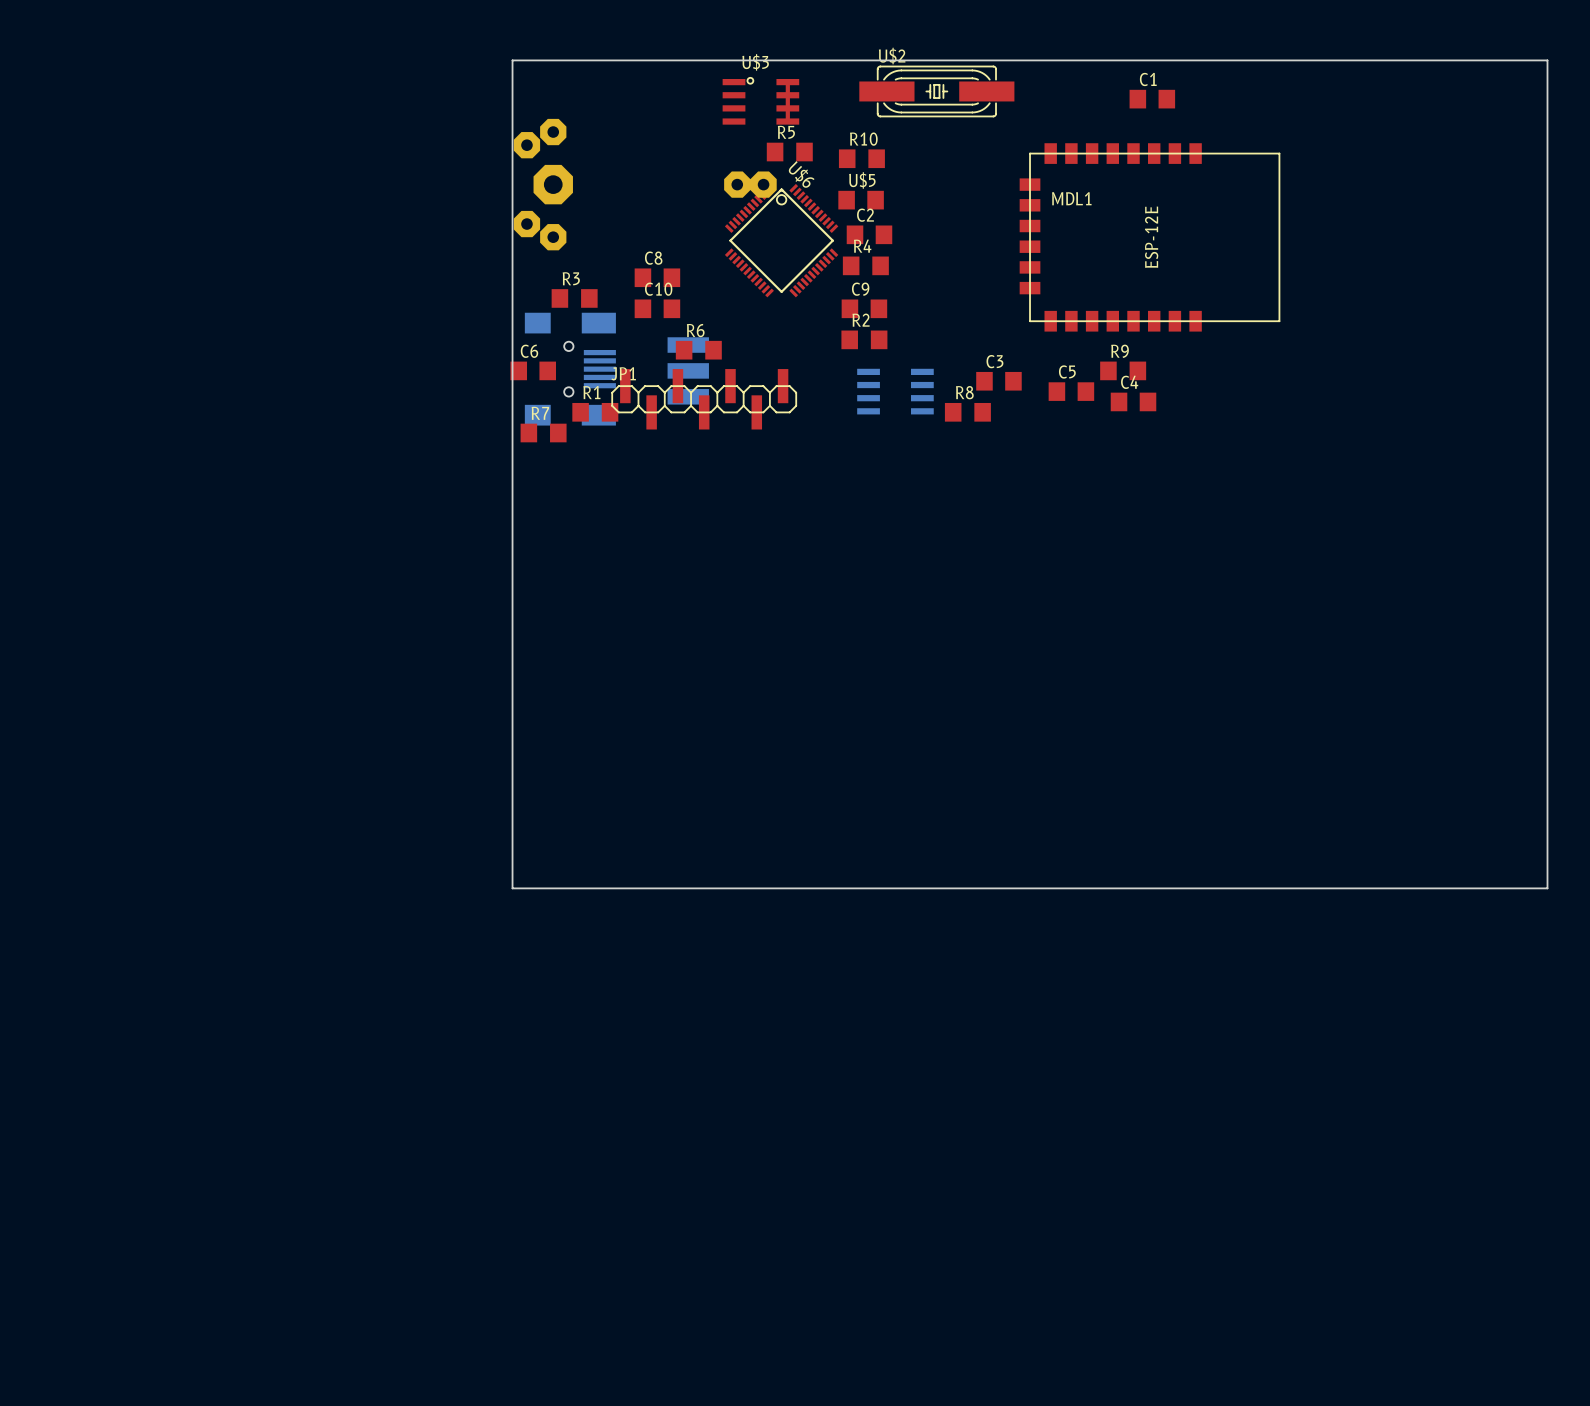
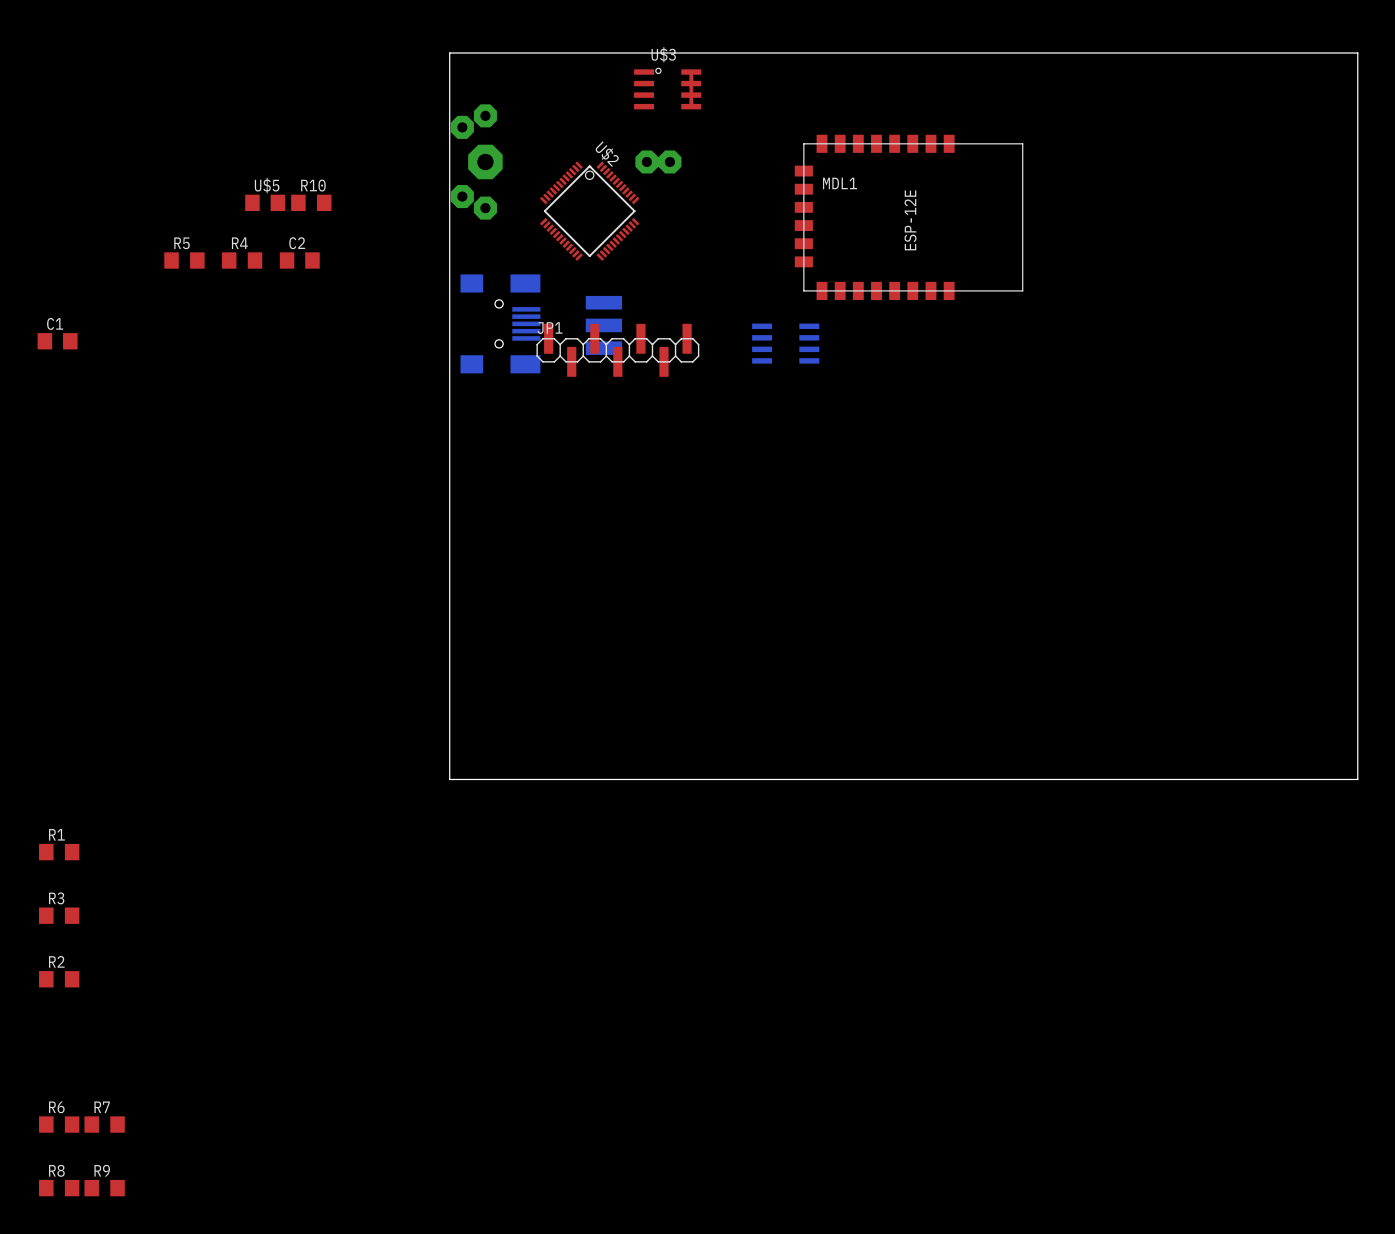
U$2 name position: U$2 (892, 55) -> U$2 (607, 154)
U$2 footprint: [859, 65, 1015, 118] -> [539, 161, 640, 261]
C1 position: (1152, 99) -> (57, 341)
R5 position: (789, 152) -> (184, 260)
R10 position: (861, 158) -> (311, 202)
U$5 position: (861, 200) -> (265, 202)
C2 position: (869, 234) -> (299, 260)
MDL1 position: (1149, 237) -> (909, 217)
U$6: (781, 240) -> none
R4 position: (865, 265) -> (242, 260)
C8: (657, 277) -> none
R3 position: (574, 298) -> (59, 915)
C10: (657, 308) -> none
C9: (864, 308) -> none
R2 position: (864, 339) -> (59, 979)
R6 position: (698, 350) -> (59, 1124)
C6: (533, 370) -> none
R9 position: (1123, 370) -> (104, 1188)
C3: (998, 381) -> none
C5: (1071, 391) -> none
C4: (1133, 401) -> none
R1 position: (595, 412) -> (59, 852)
R8 position: (967, 412) -> (59, 1188)
R7 position: (543, 433) -> (104, 1124)

